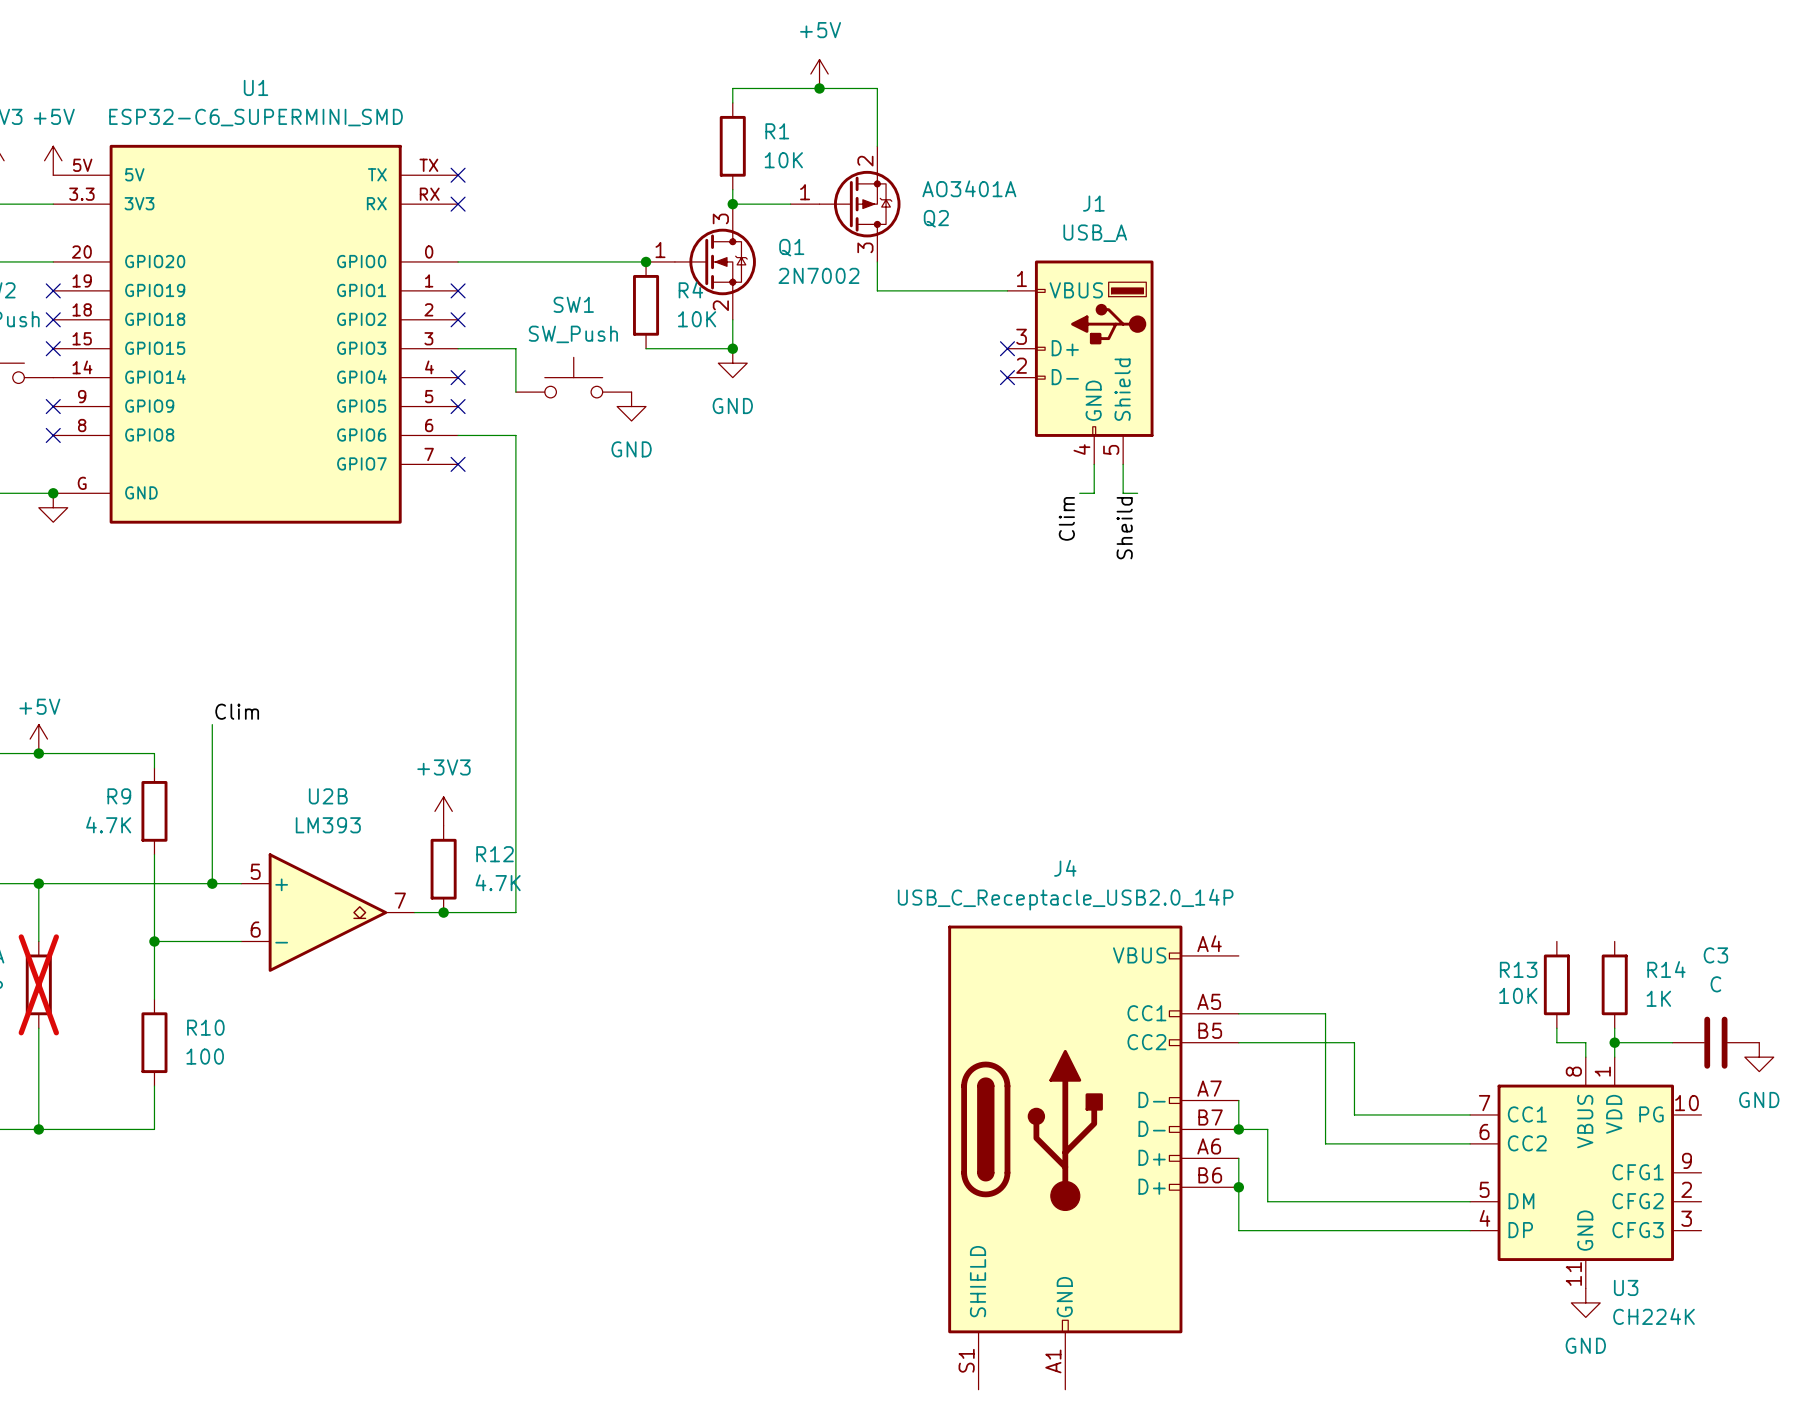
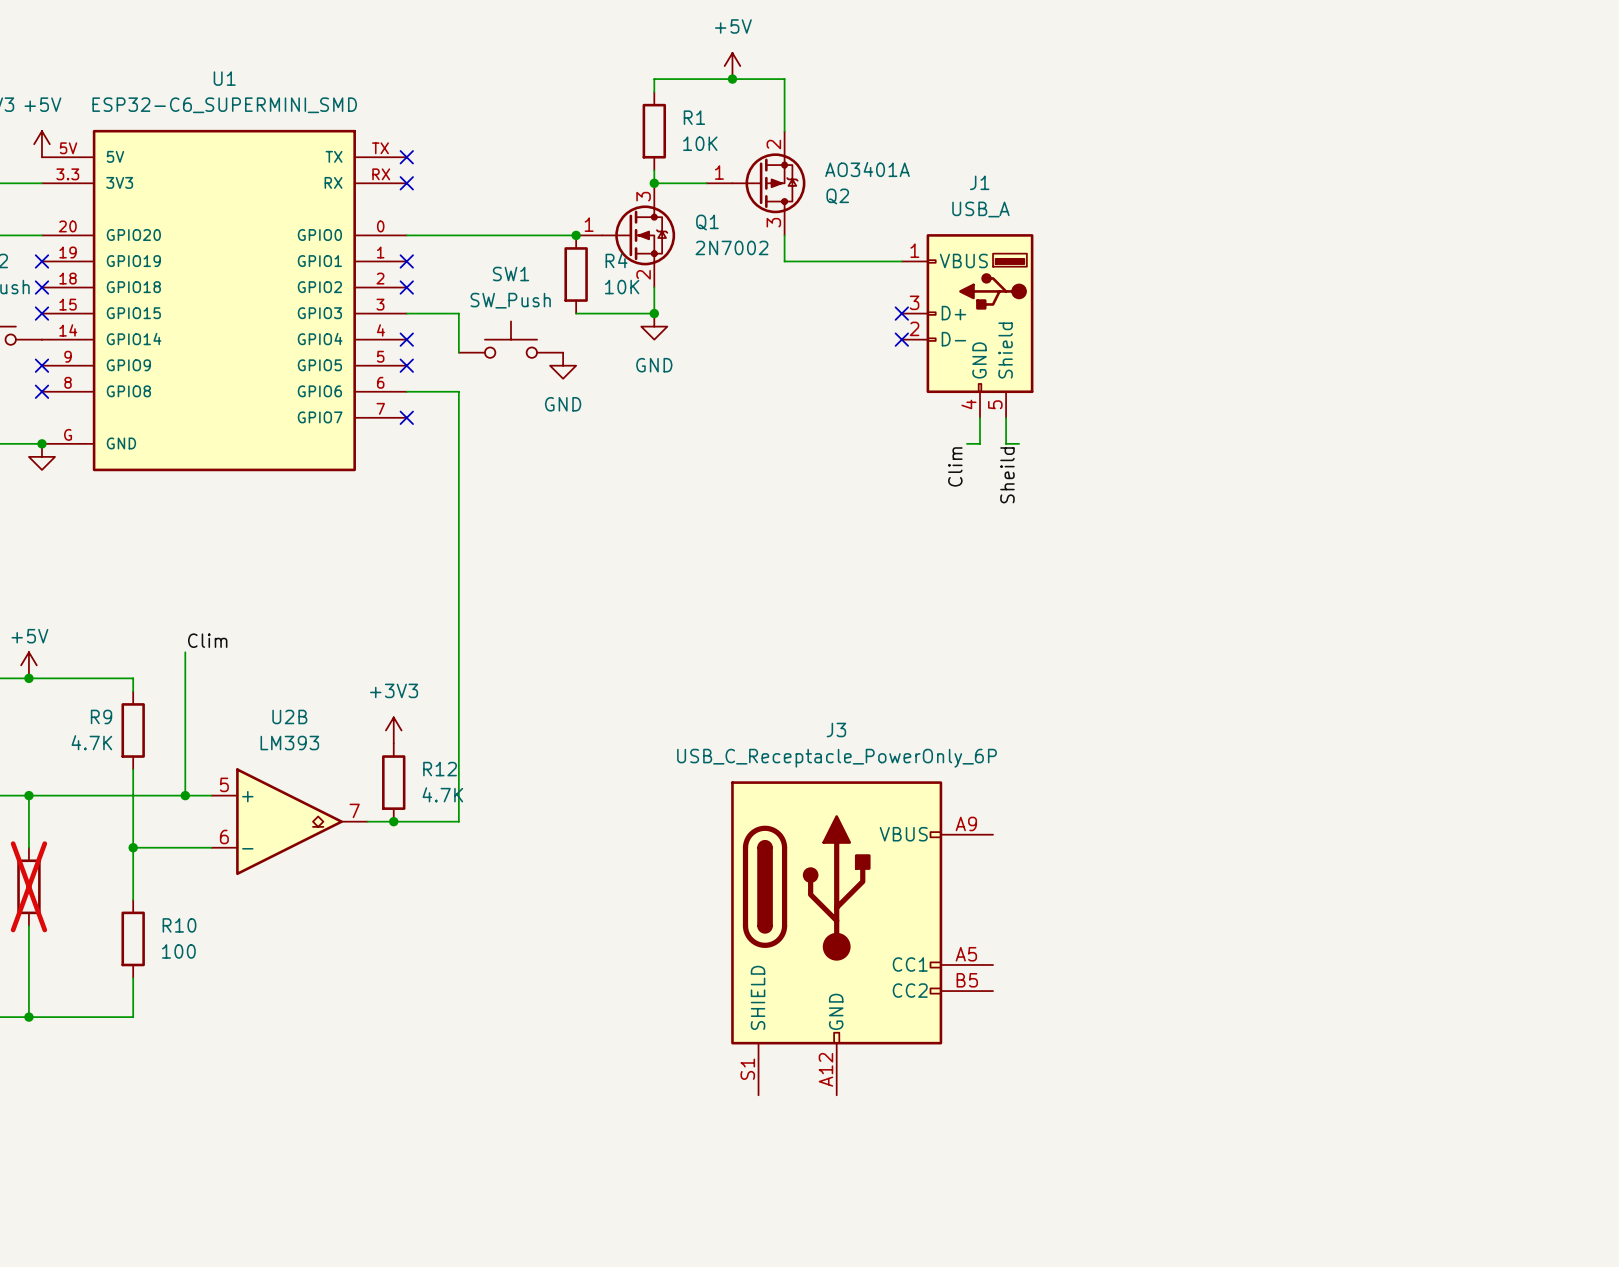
R13: 10K (1556, 984) -> none
R14: 1K (1614, 984) -> none
wire: (1238, 1013) (1325, 1013) (1325, 1143) (1470, 1143) -> none
wire: (1556, 1028) (1556, 1042) (1585, 1042) (1585, 1057) -> none
wire: (1614, 1028) (1614, 1057) -> none
J3: none -> USB_C_Receptacle_PowerOnly_6P (862, 938)
wire: (1238, 1042) (1354, 1042) (1354, 1114) (1470, 1114) -> none
wire: (1614, 1042) (1672, 1042) -> none
junction: (1614, 1042) -> none
C3: C (1715, 1042) -> none
power symbol: GND (1759, 1057) -> none
wire: (1238, 1100) (1238, 1129) (1267, 1129) (1267, 1201) (1470, 1201) -> none
junction: (1238, 1129) -> none
J4: USB_C_Receptacle_USB2.0_14P (1093, 1157) -> none
wire: (1238, 1158) (1238, 1230) (1470, 1230) -> none
U3: CH224K (1585, 1172) -> none
junction: (1238, 1187) -> none
power symbol: GND (1585, 1302) -> none

